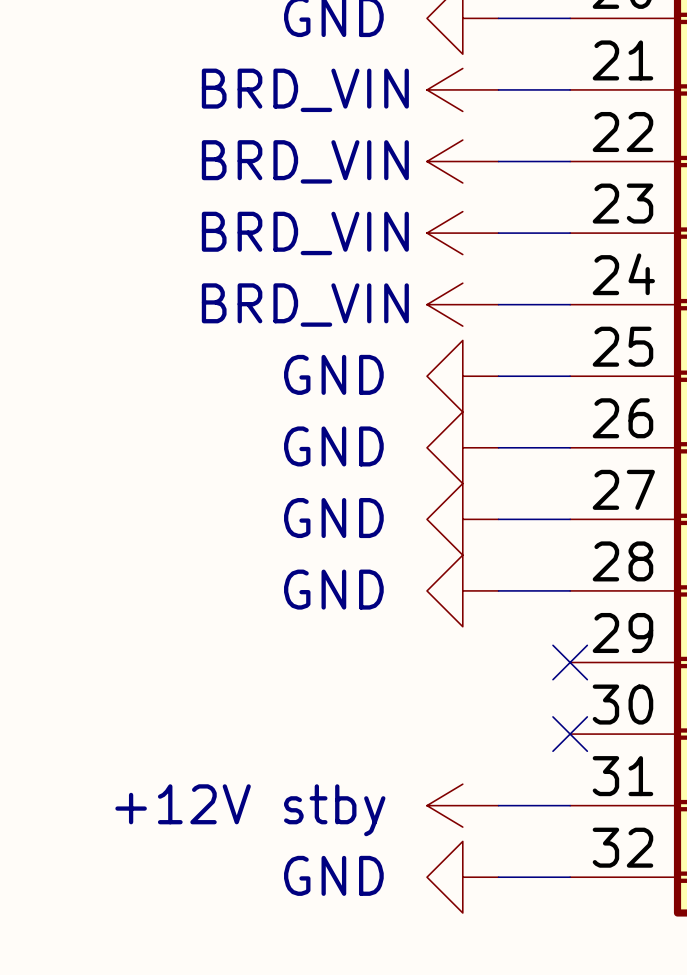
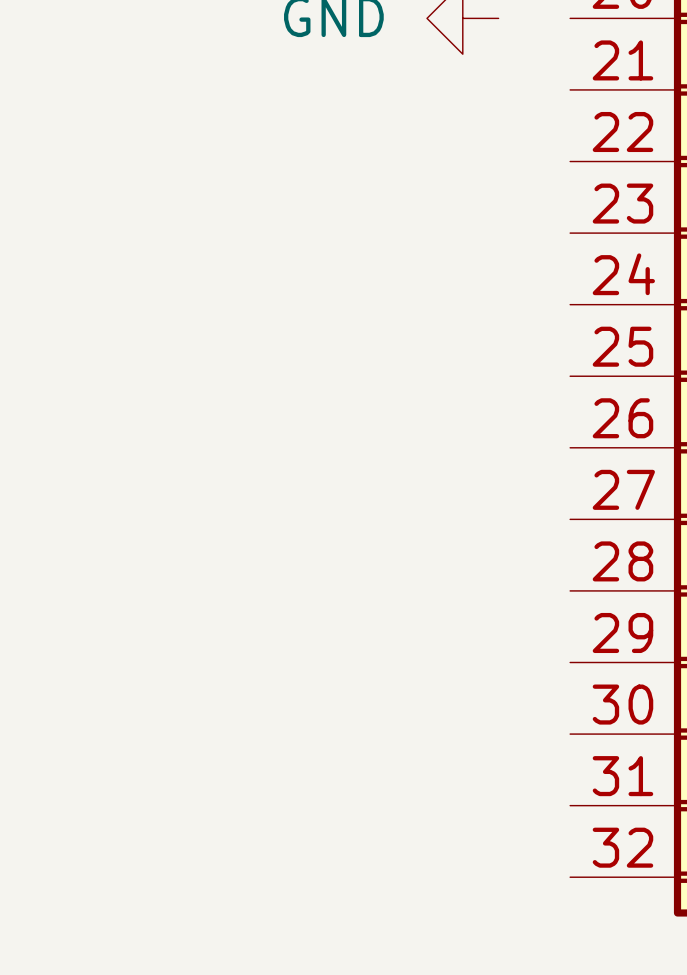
wire: (498, 18) (570, 18) -> none
power symbol: BRD_VIN (462, 89) -> none
wire: (498, 89) (570, 89) -> none
power symbol: BRD_VIN (462, 161) -> none
wire: (498, 161) (570, 161) -> none
power symbol: BRD_VIN (462, 233) -> none
wire: (498, 233) (570, 233) -> none
power symbol: BRD_VIN (462, 304) -> none
wire: (498, 304) (570, 304) -> none
power symbol: GND (462, 376) -> none
wire: (498, 376) (570, 376) -> none
power symbol: GND (462, 447) -> none
wire: (498, 447) (570, 447) -> none
power symbol: GND (462, 519) -> none
wire: (498, 519) (570, 519) -> none
power symbol: GND (462, 590) -> none
wire: (498, 590) (570, 590) -> none
no-connect mark: (570, 662) -> none
no-connect mark: (570, 734) -> none
power symbol: +12V stby (462, 805) -> none
wire: (498, 805) (570, 805) -> none
power symbol: GND (462, 877) -> none
wire: (498, 877) (570, 877) -> none

